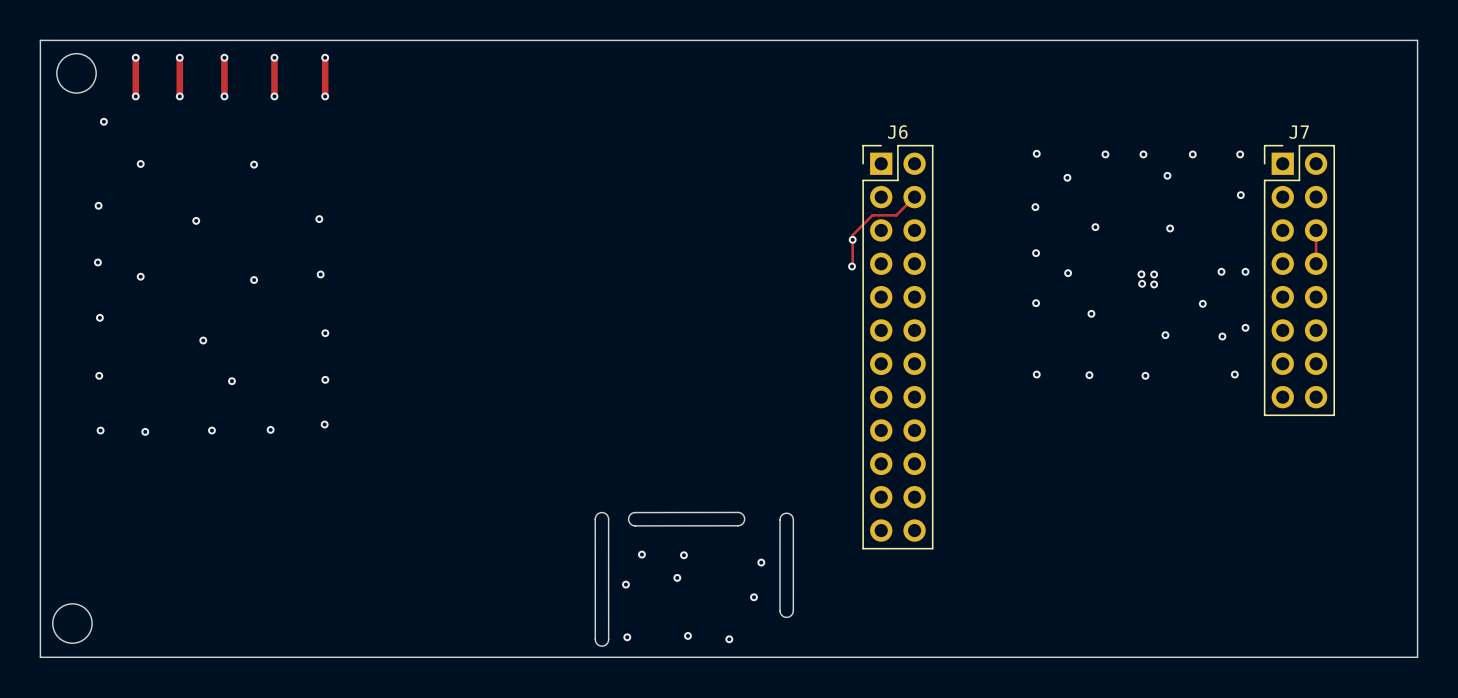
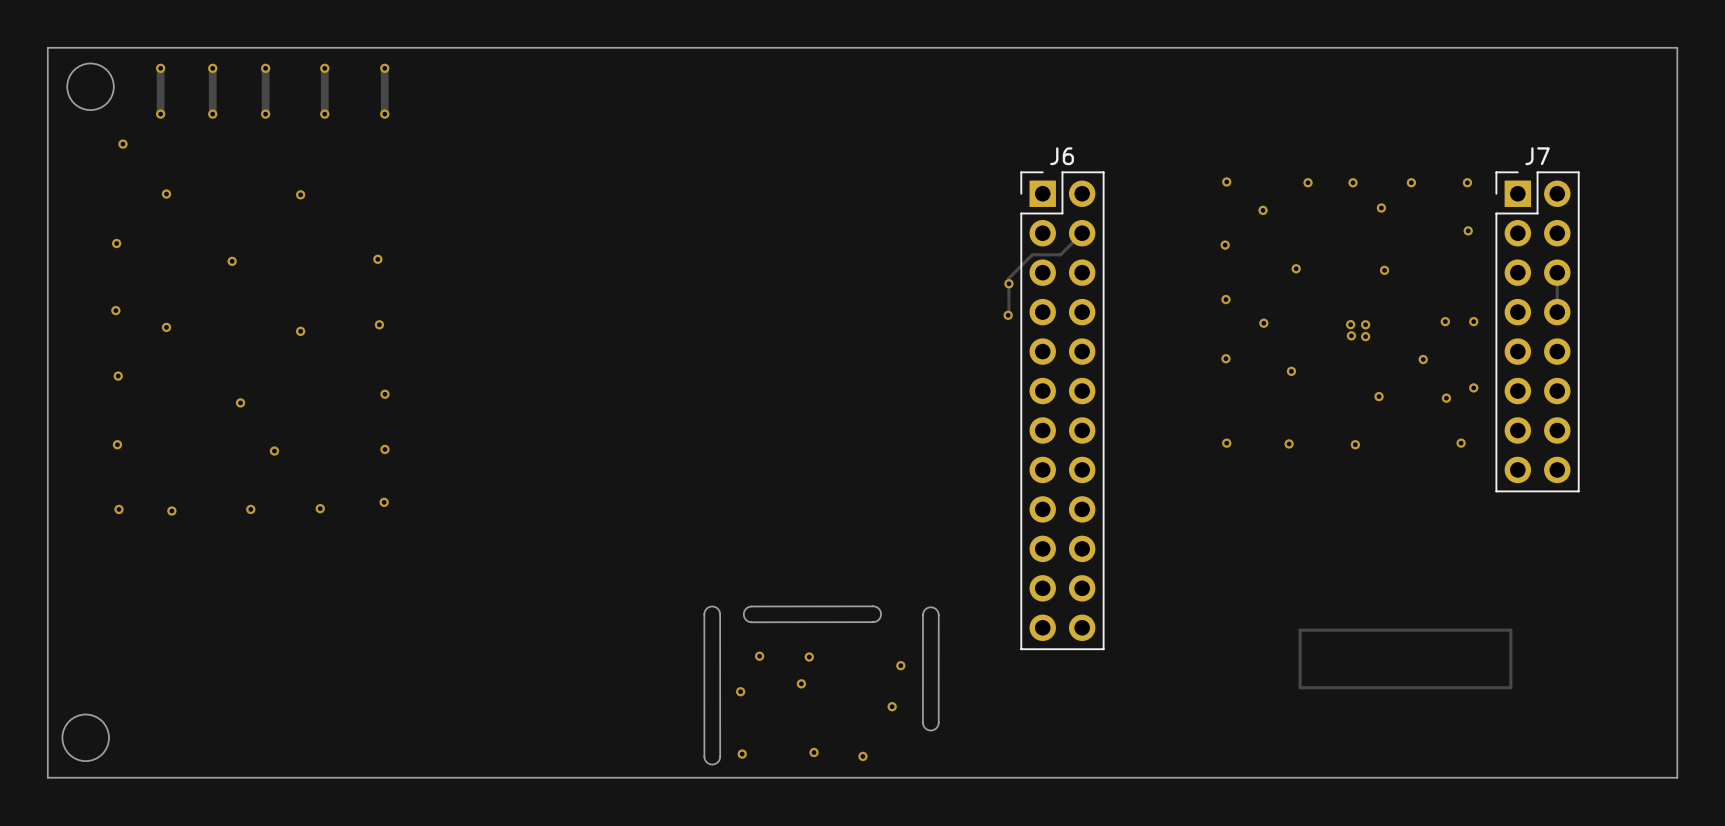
track: none -> (1300, 630) (1510, 630) (1510, 687) (1300, 687) (1300, 630)

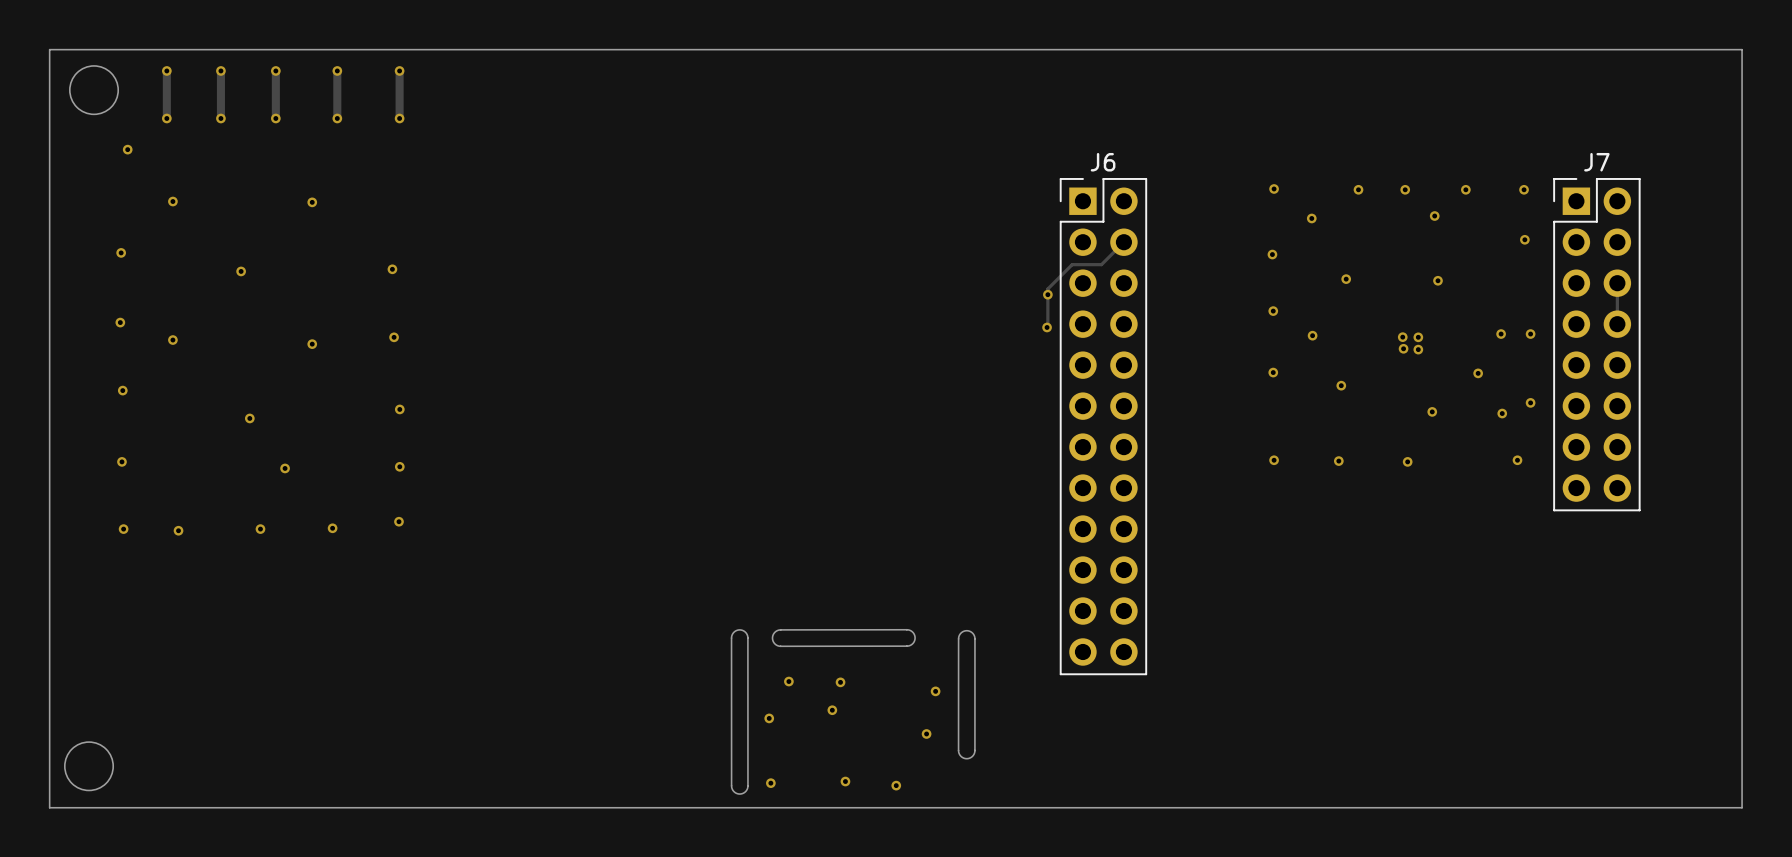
track: (1300, 630) (1510, 630) (1510, 687) (1300, 687) (1300, 630) -> none

